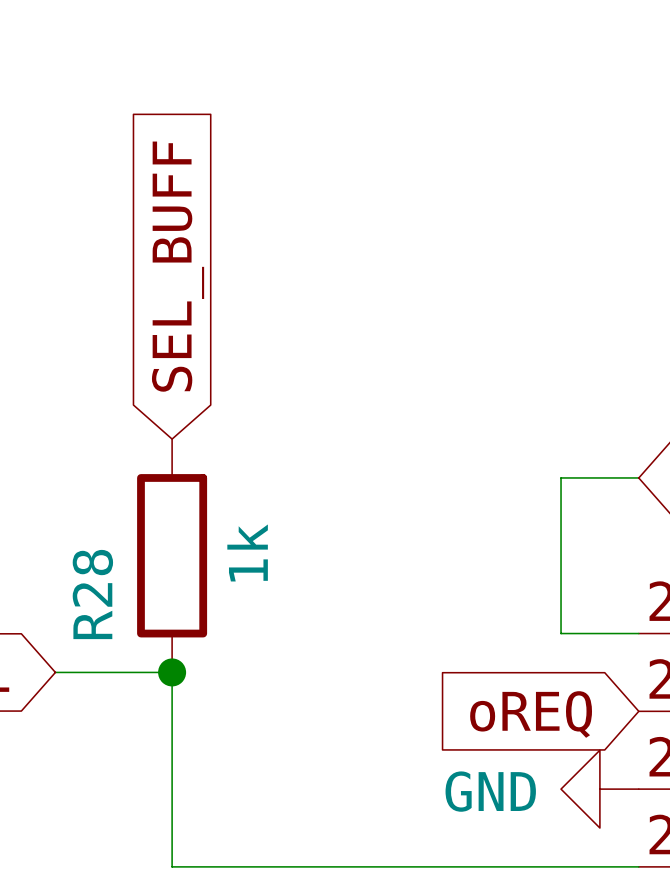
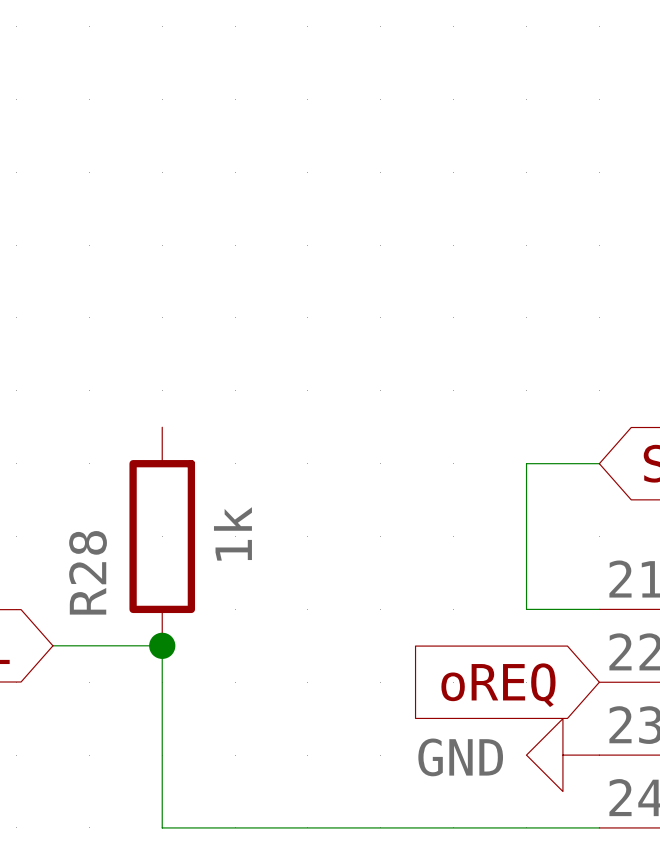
global label: SEL_BUFF (178, 266) -> none

